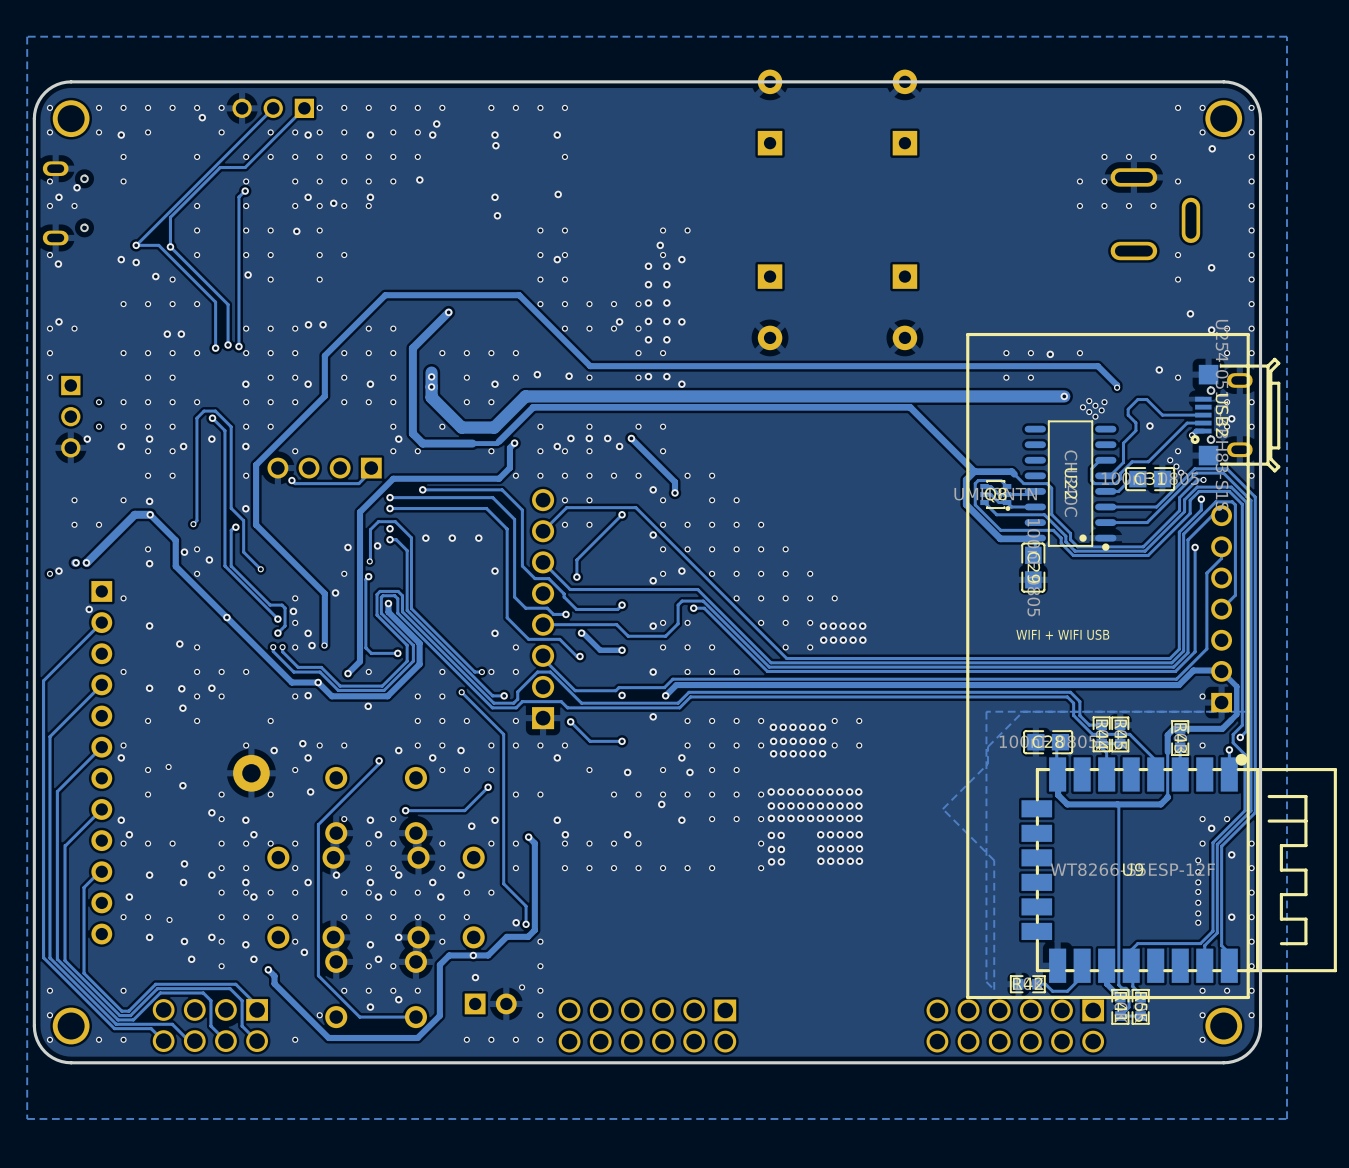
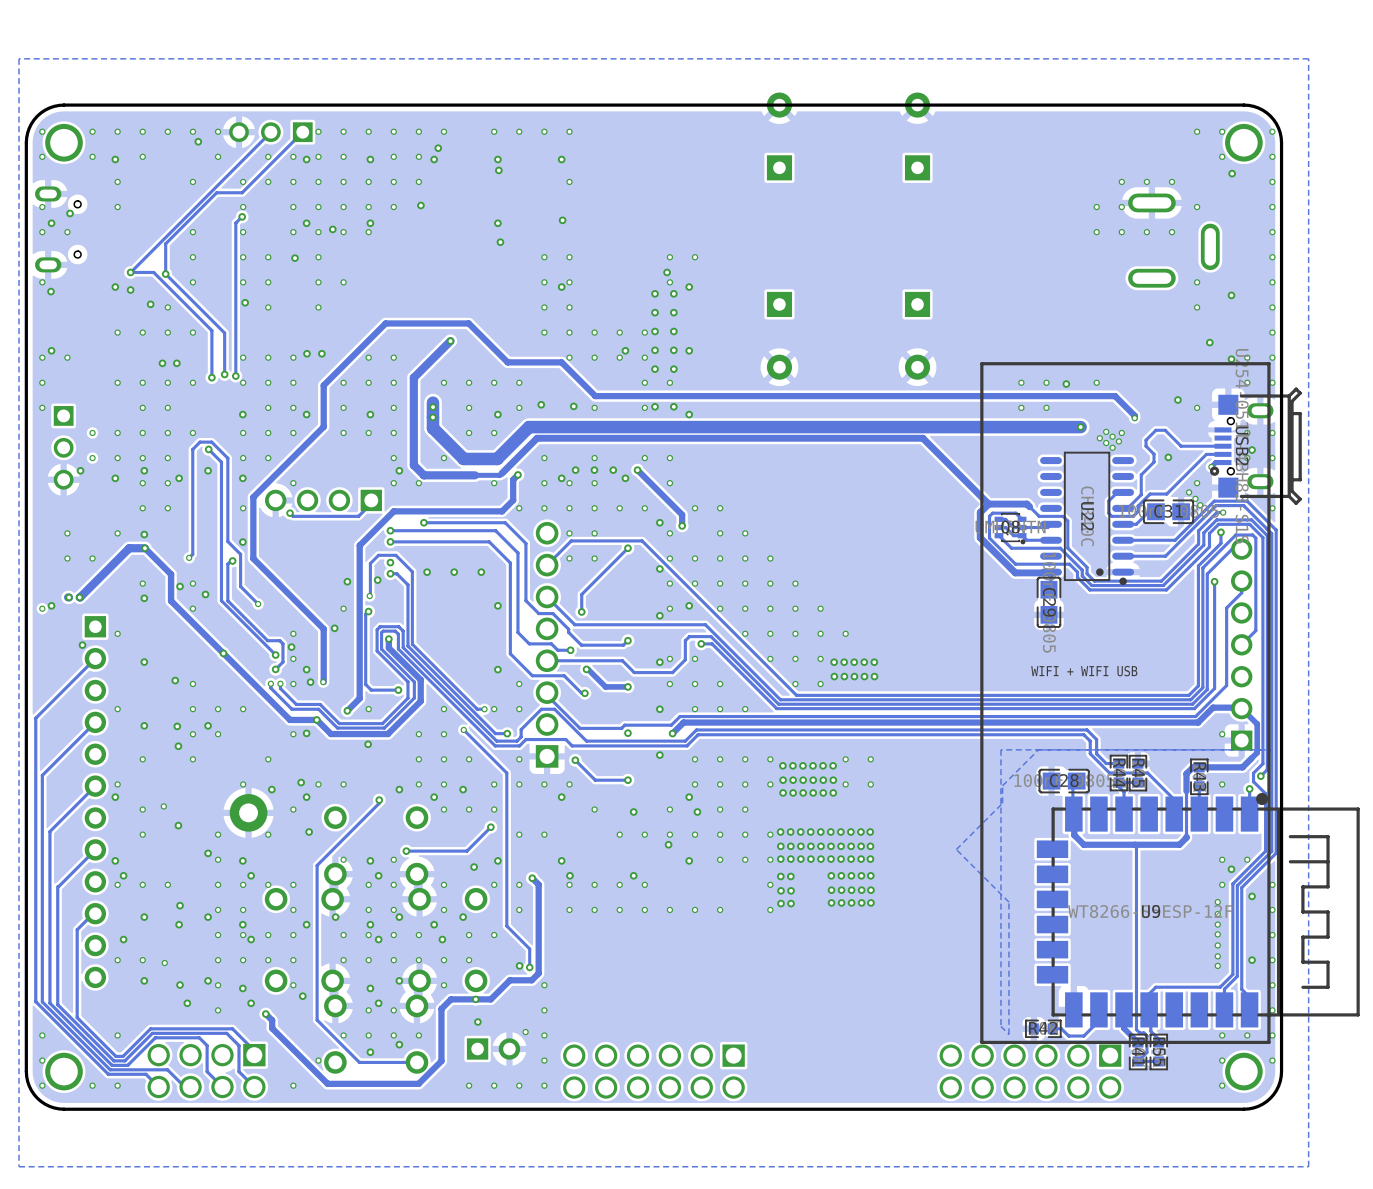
track: (466, 295) (519, 295) (557, 333) -> (468, 323) (507, 362) (561, 362)

